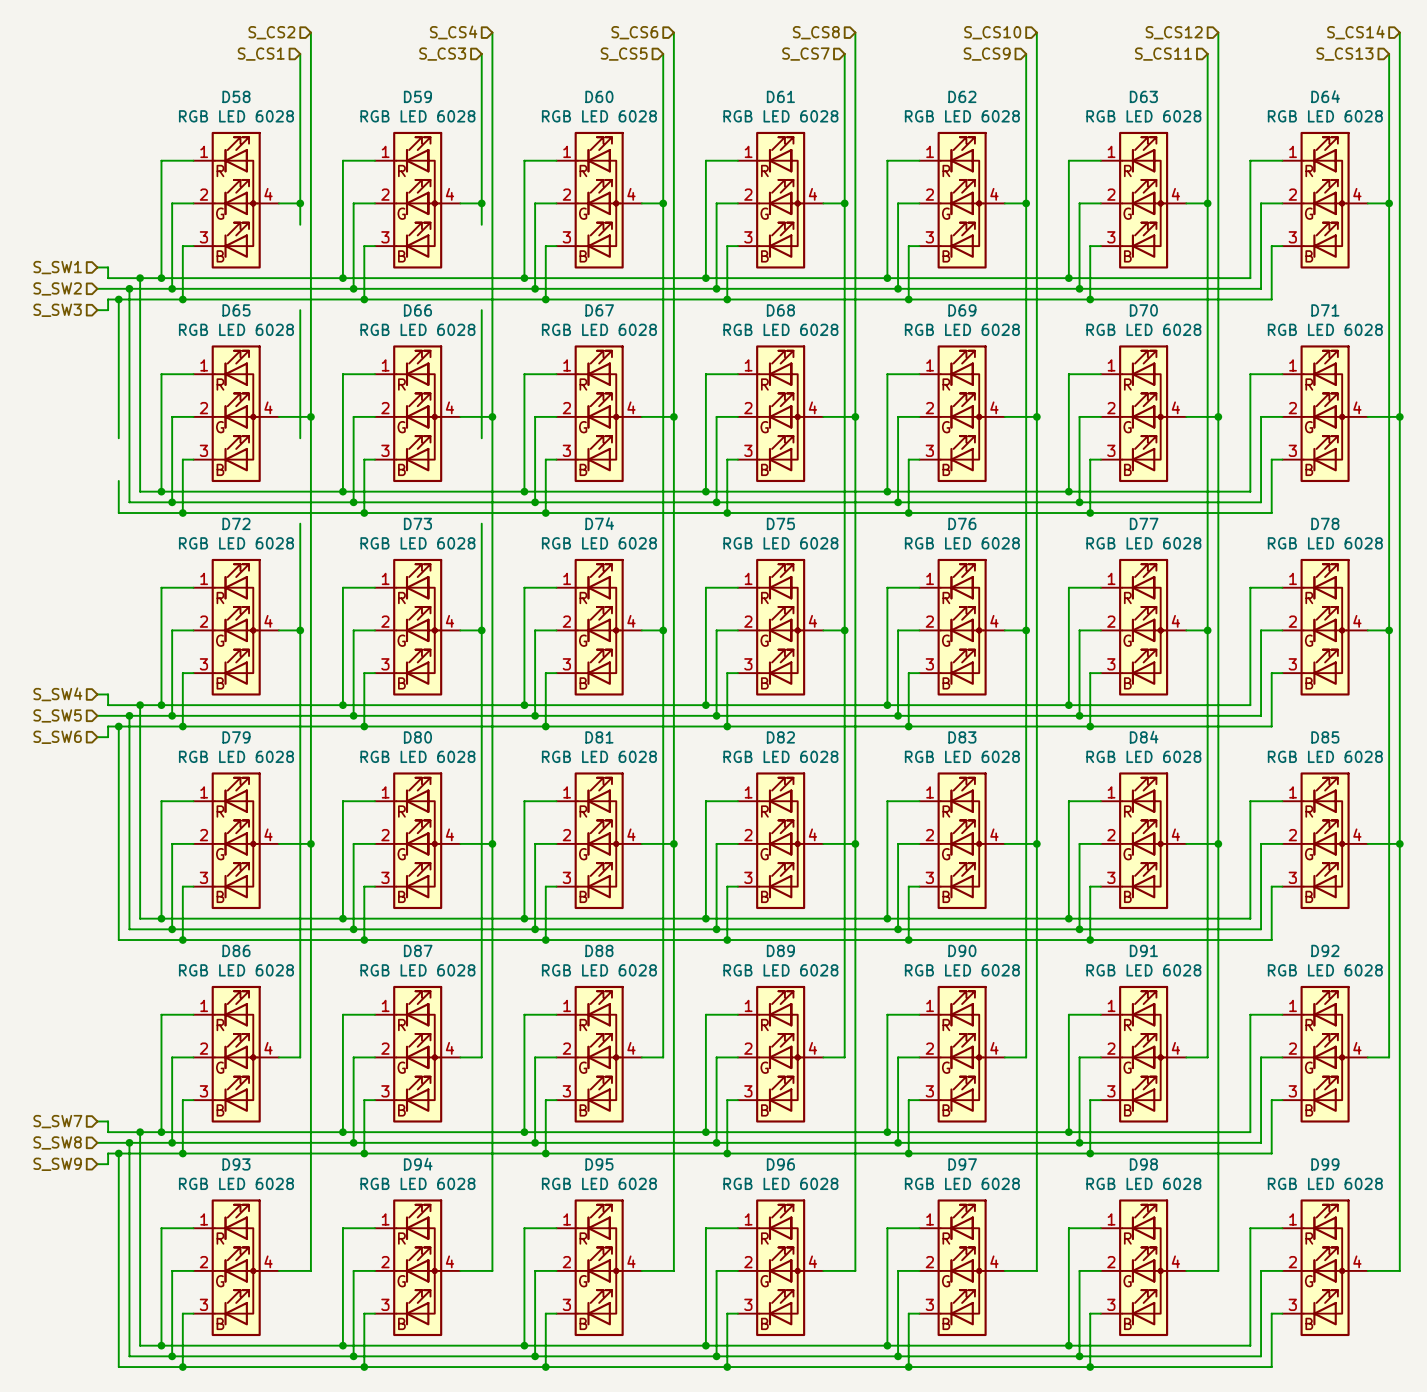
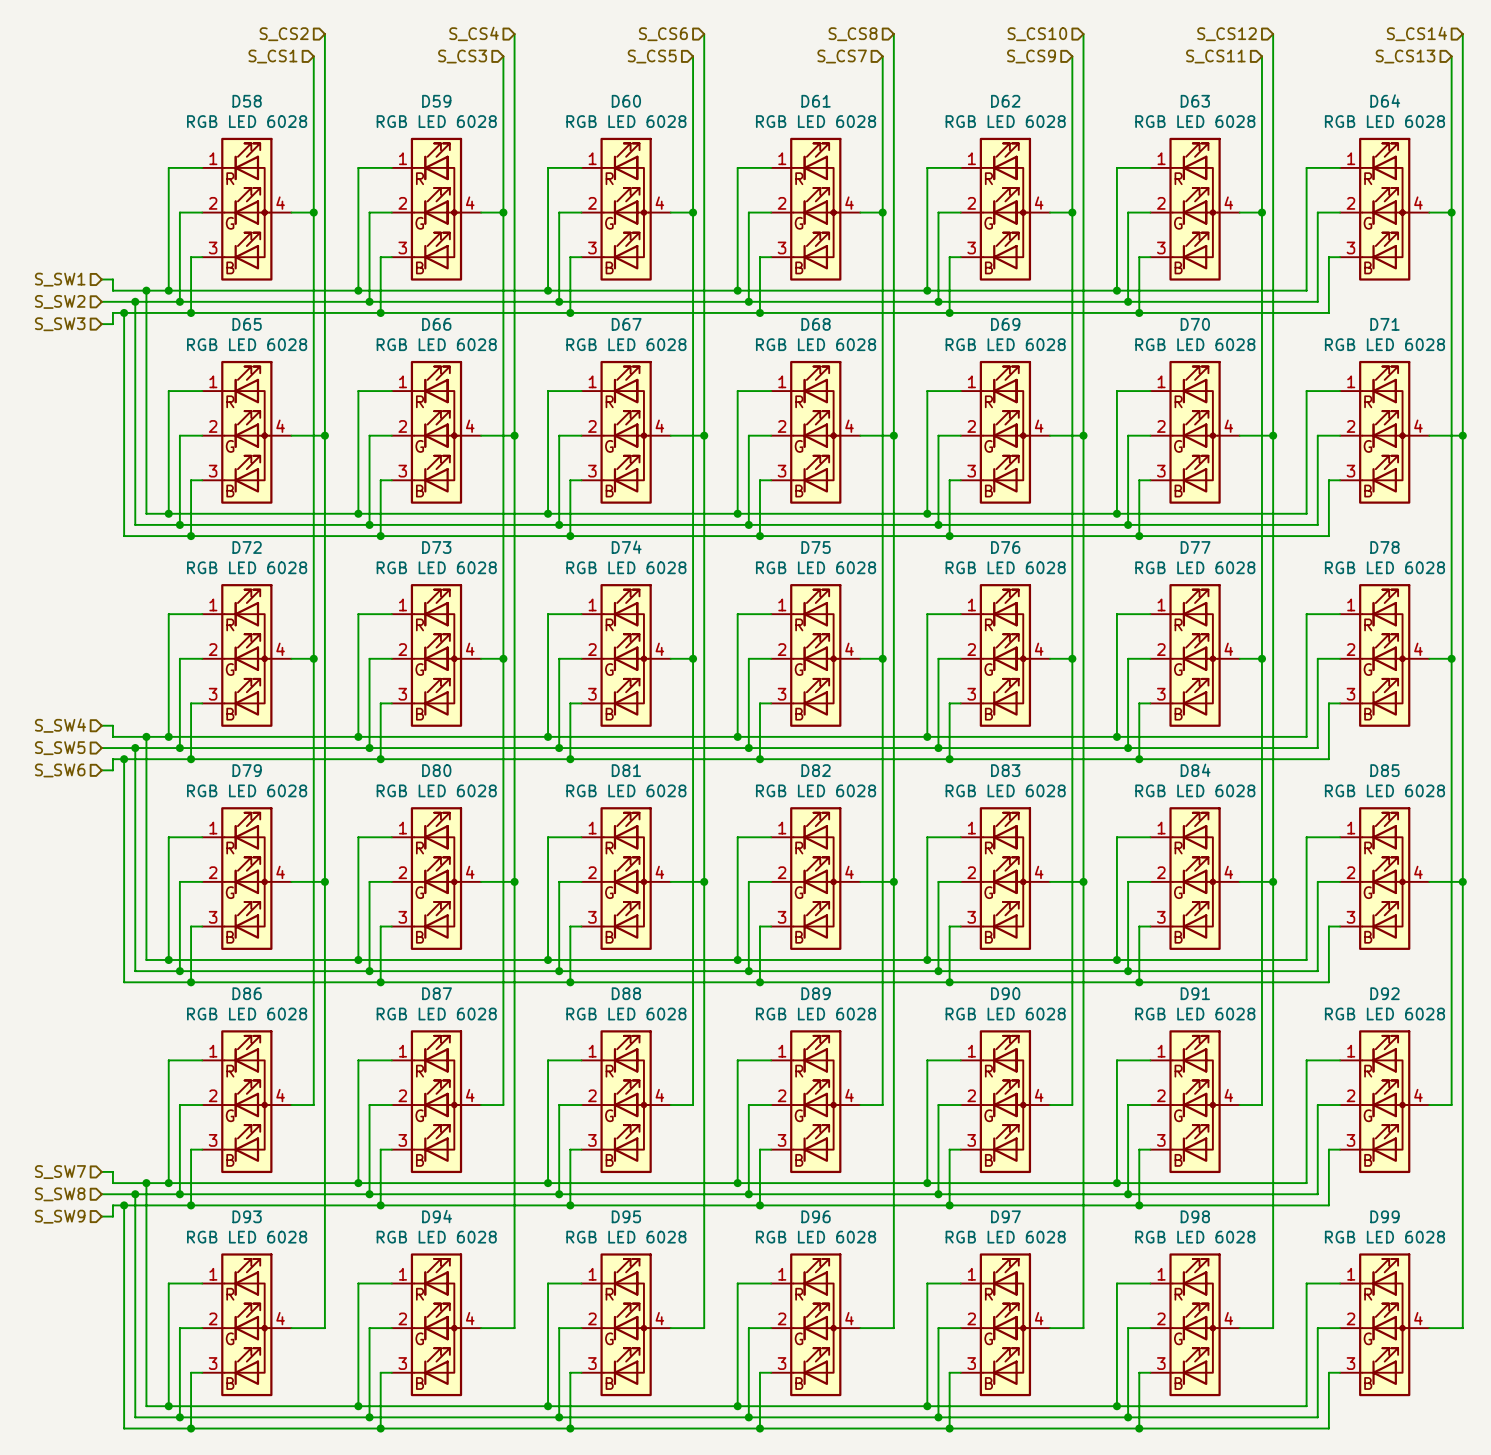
wire: none -> (313, 234) (313, 324)
wire: none -> (503, 234) (503, 324)
wire: none -> (124, 457) (124, 502)
wire: none -> (313, 457) (313, 547)
wire: none -> (503, 457) (503, 547)

